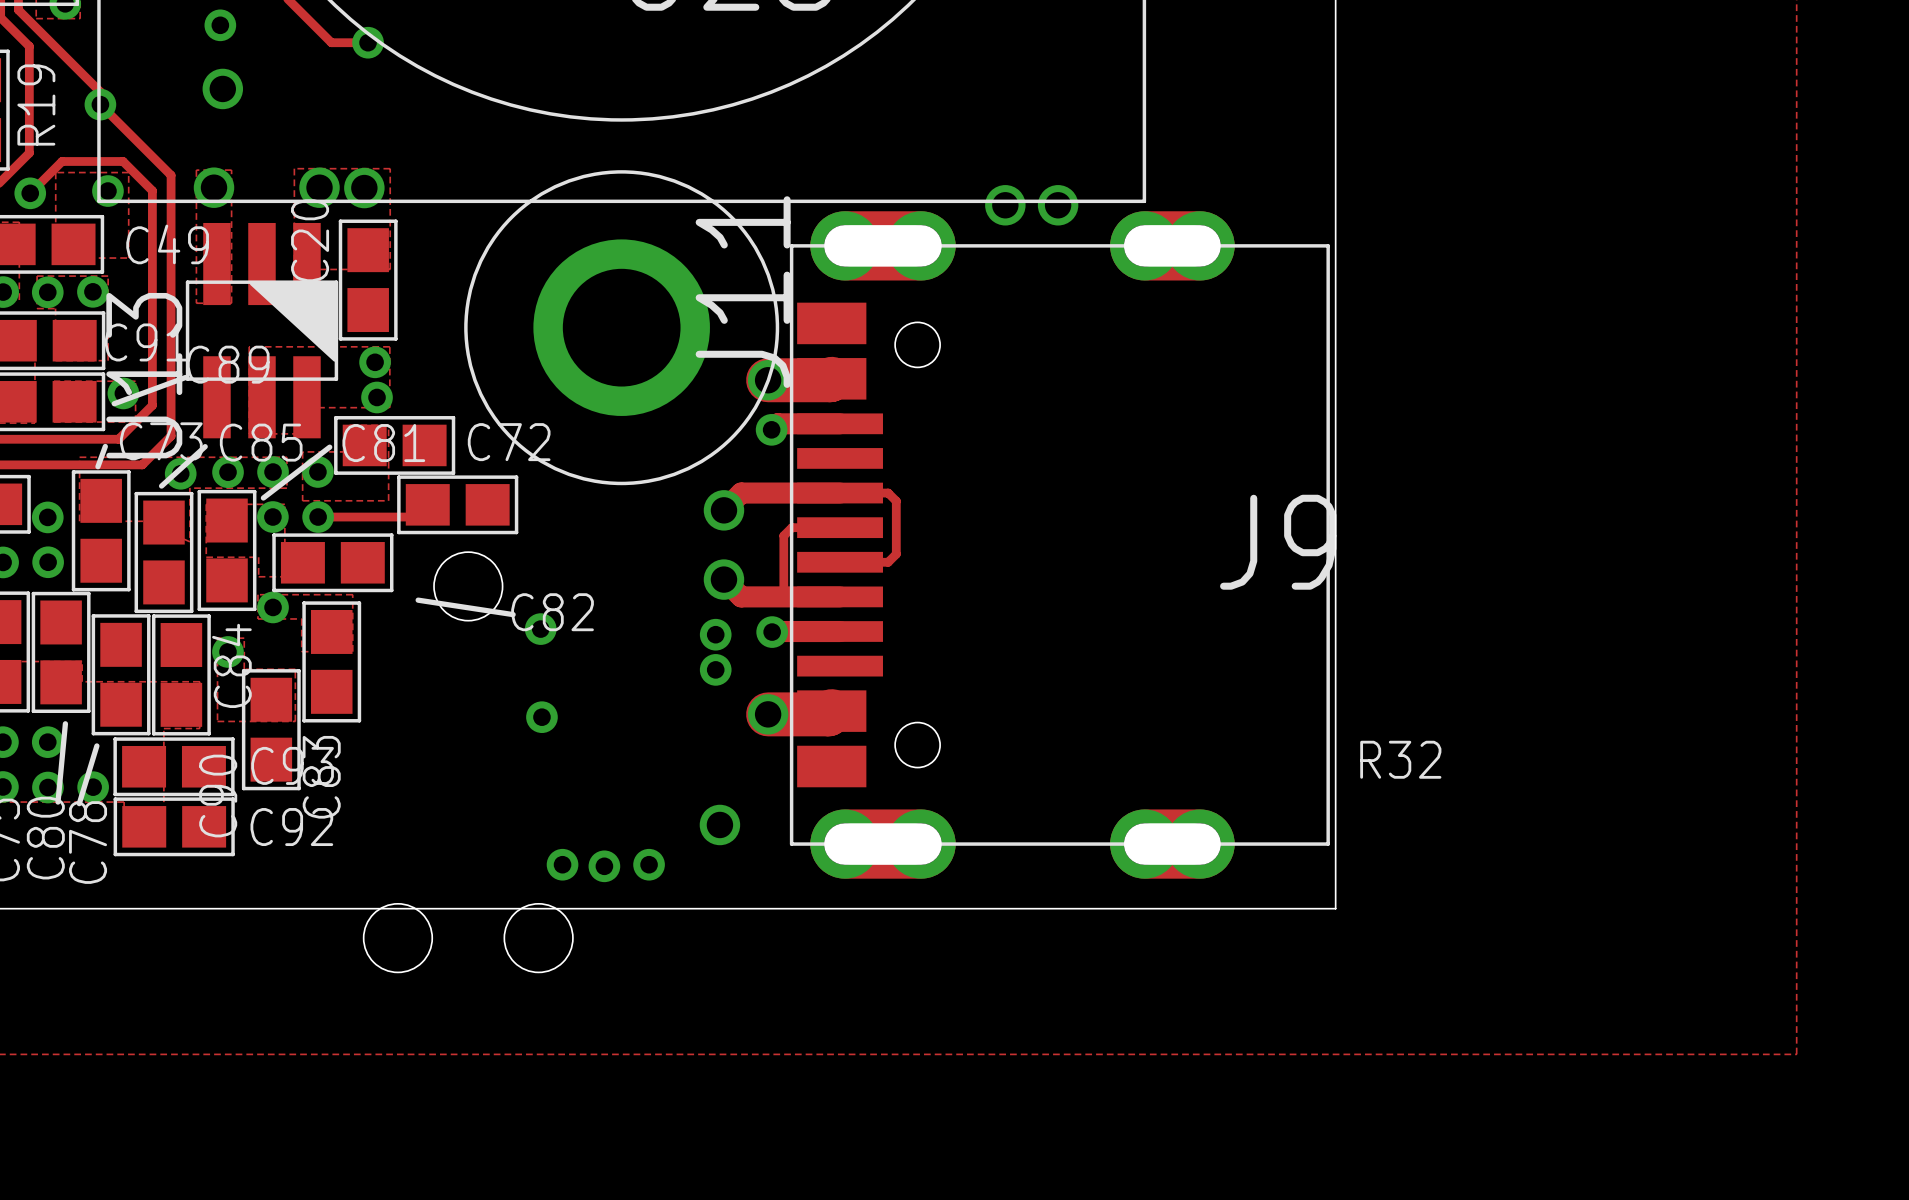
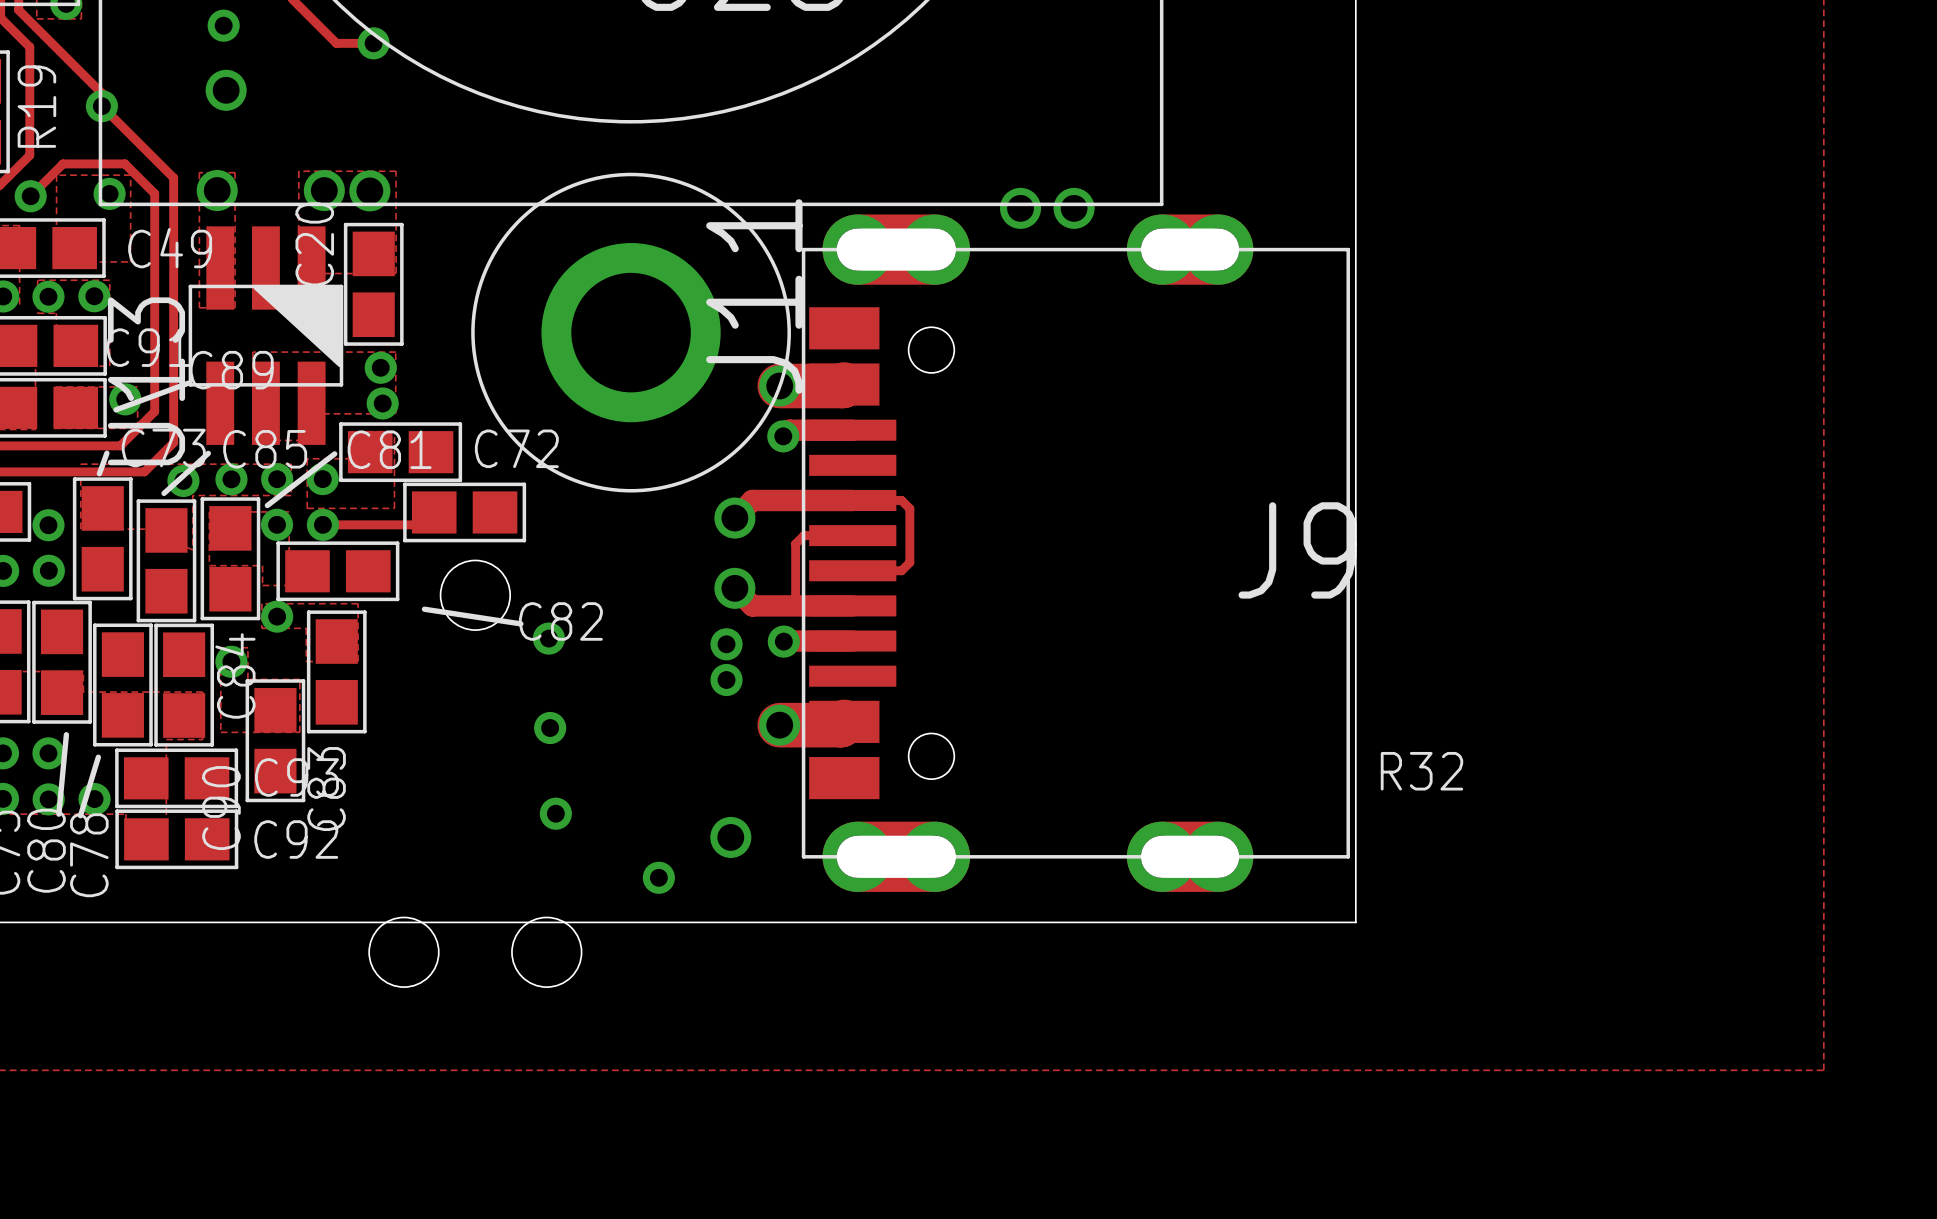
via: none -> (555, 813)
via: (562, 864) -> none
via: (604, 866) -> none

